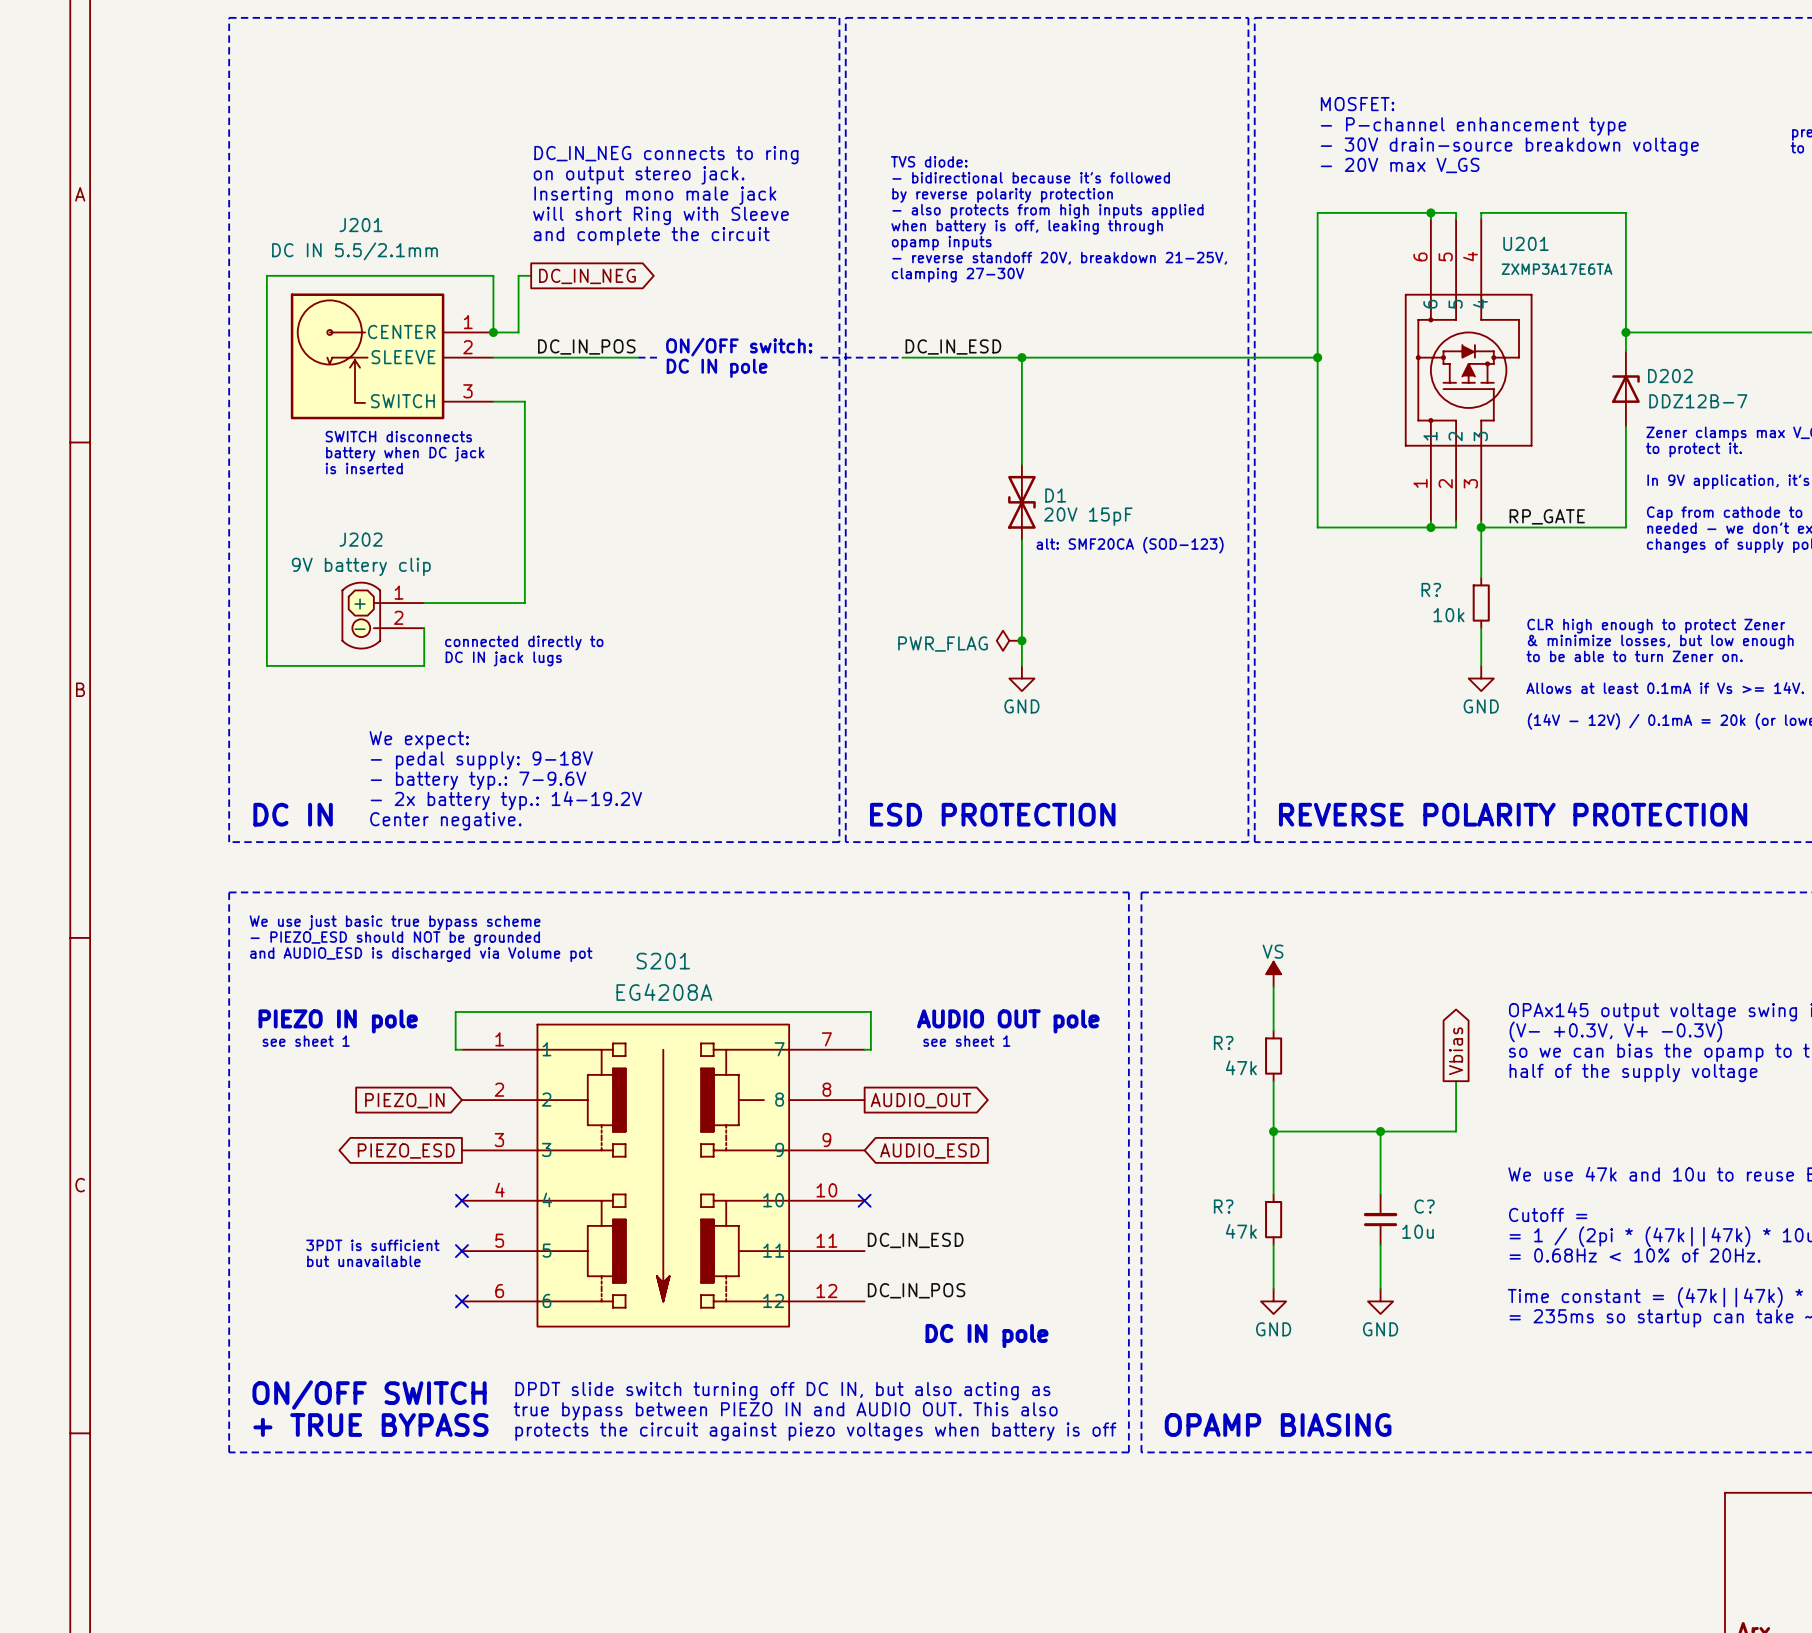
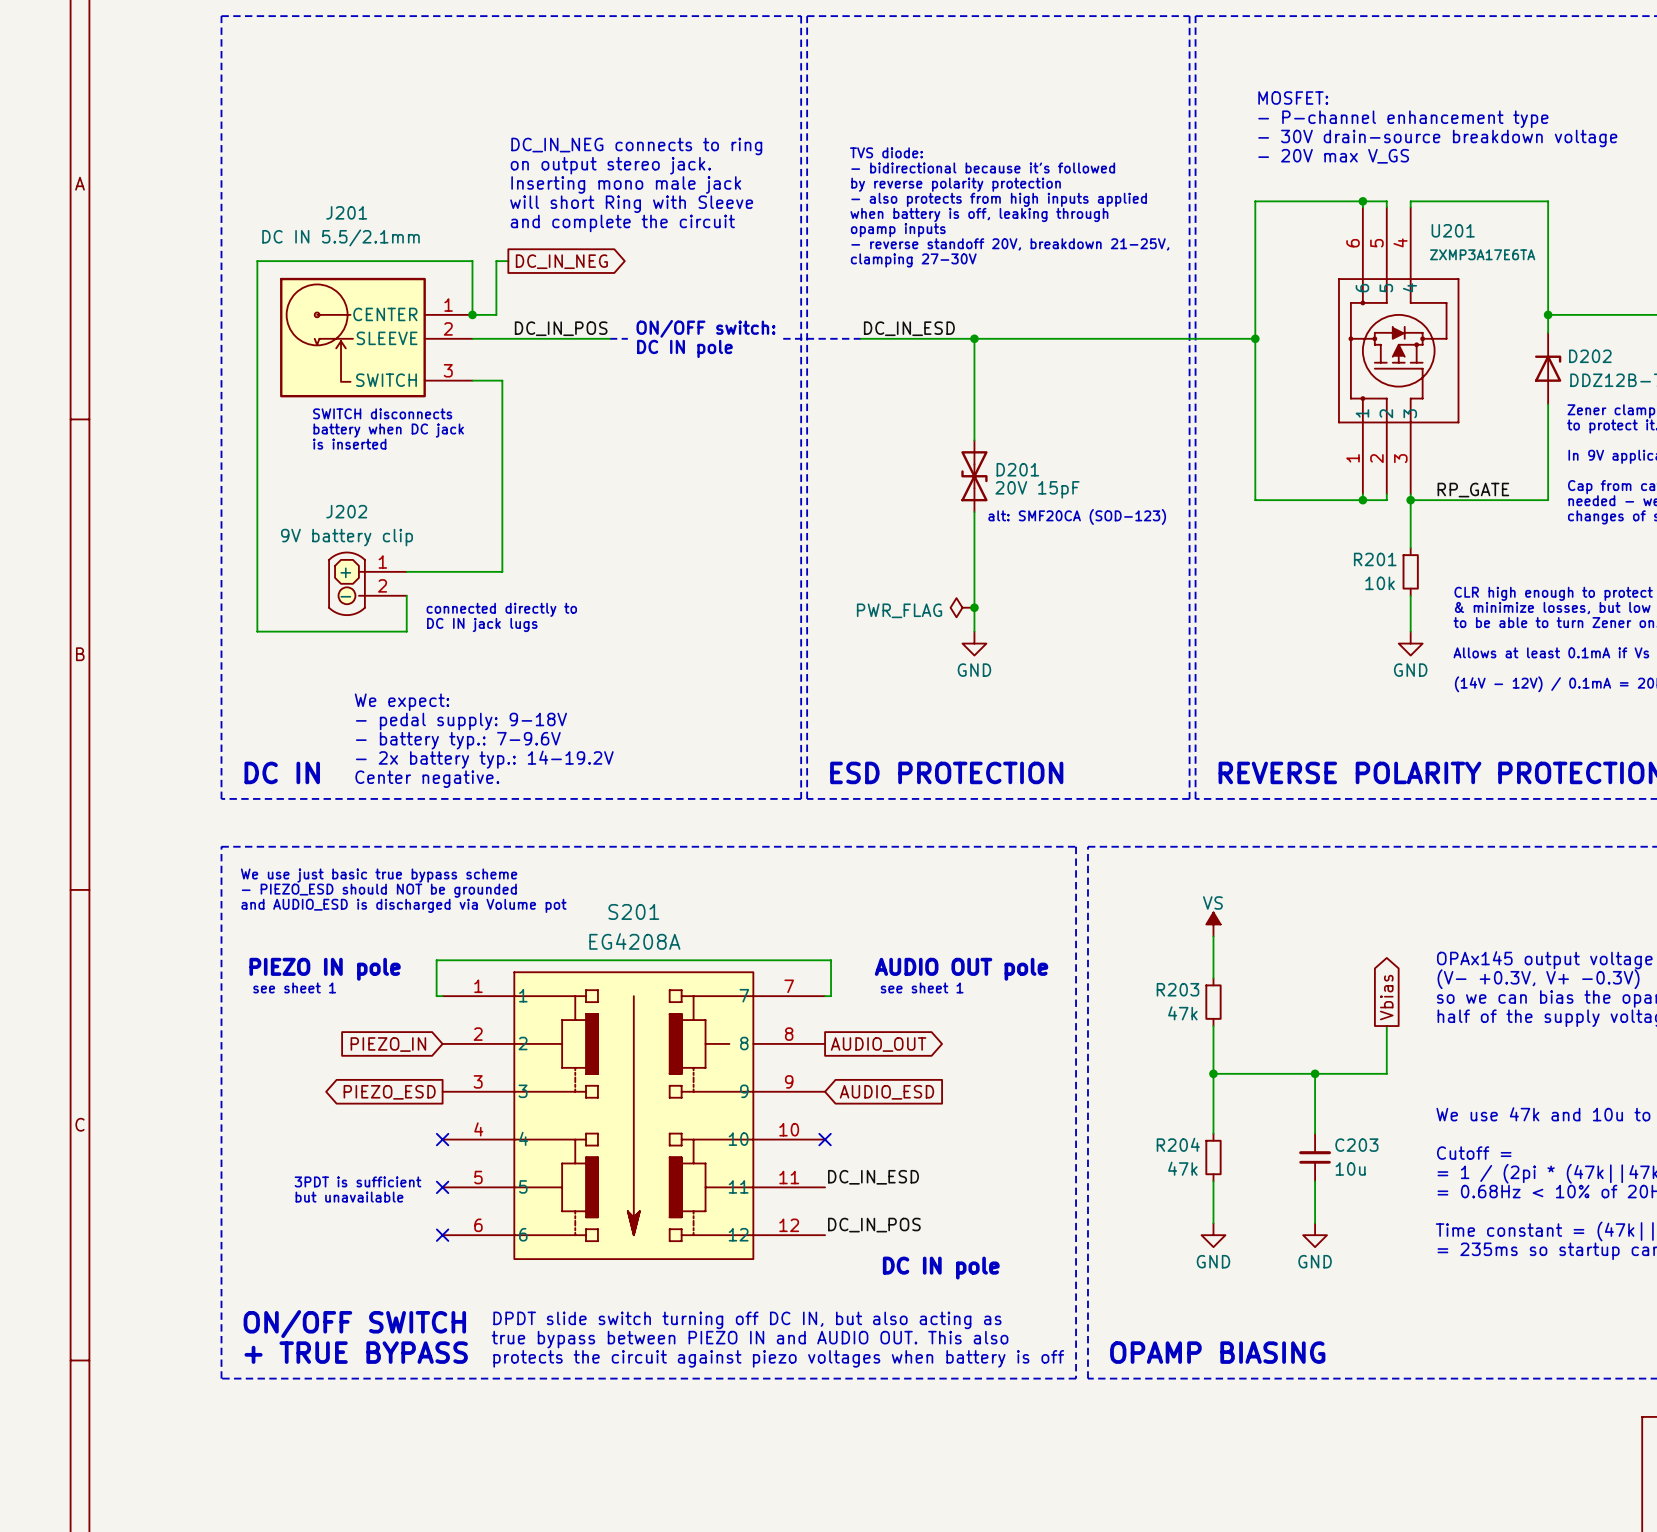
D1 name: D1 (1055, 495) -> D201 (1017, 469)
R? name: R? (1431, 589) -> R201 (1375, 559)
R? name: R? (1223, 1042) -> R203 (1178, 989)
R? name: R? (1223, 1206) -> R204 (1178, 1144)
C? name: C? (1424, 1206) -> C203 (1356, 1145)

